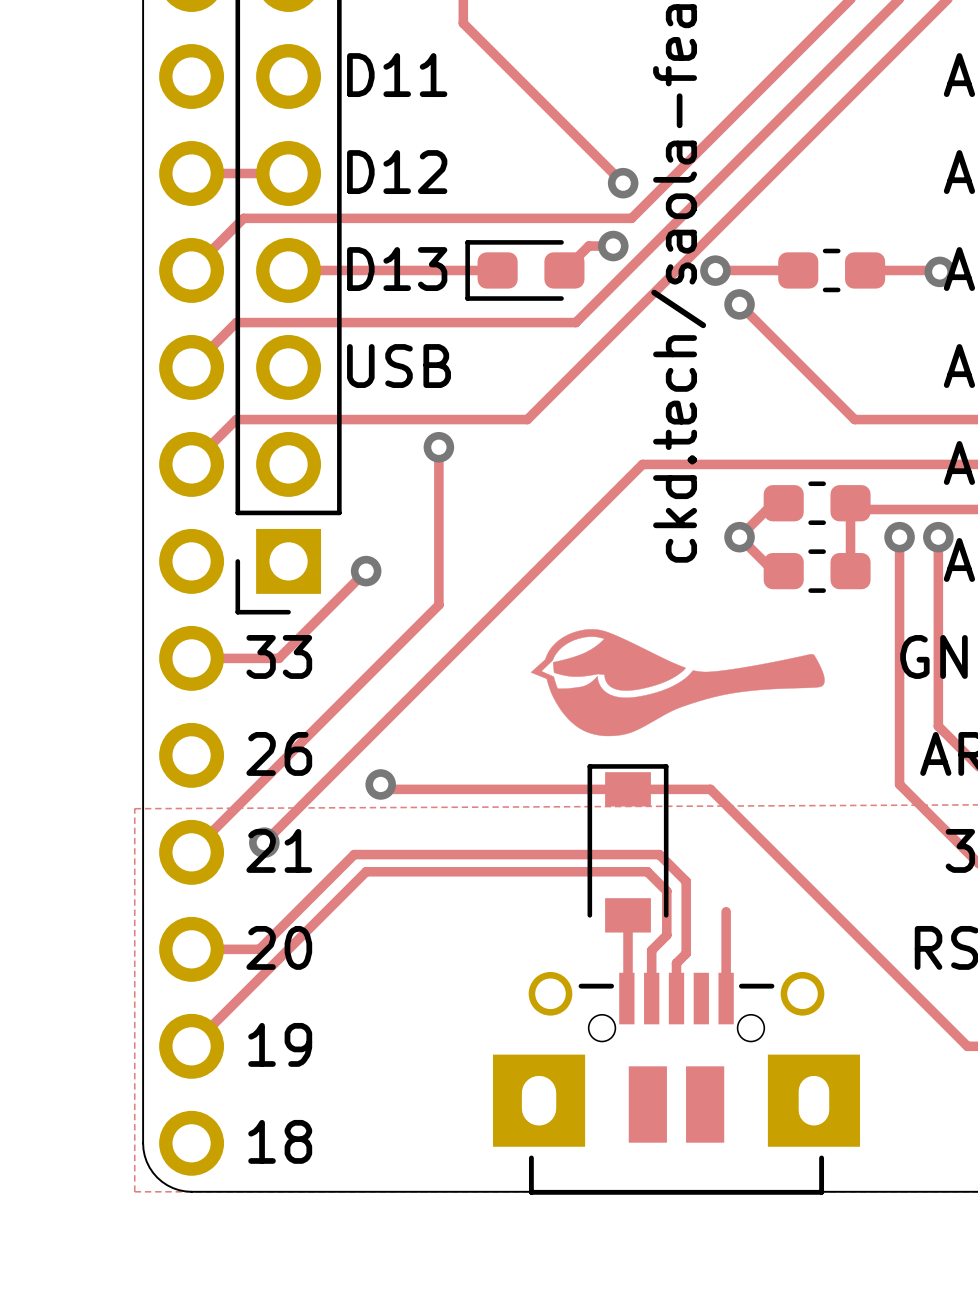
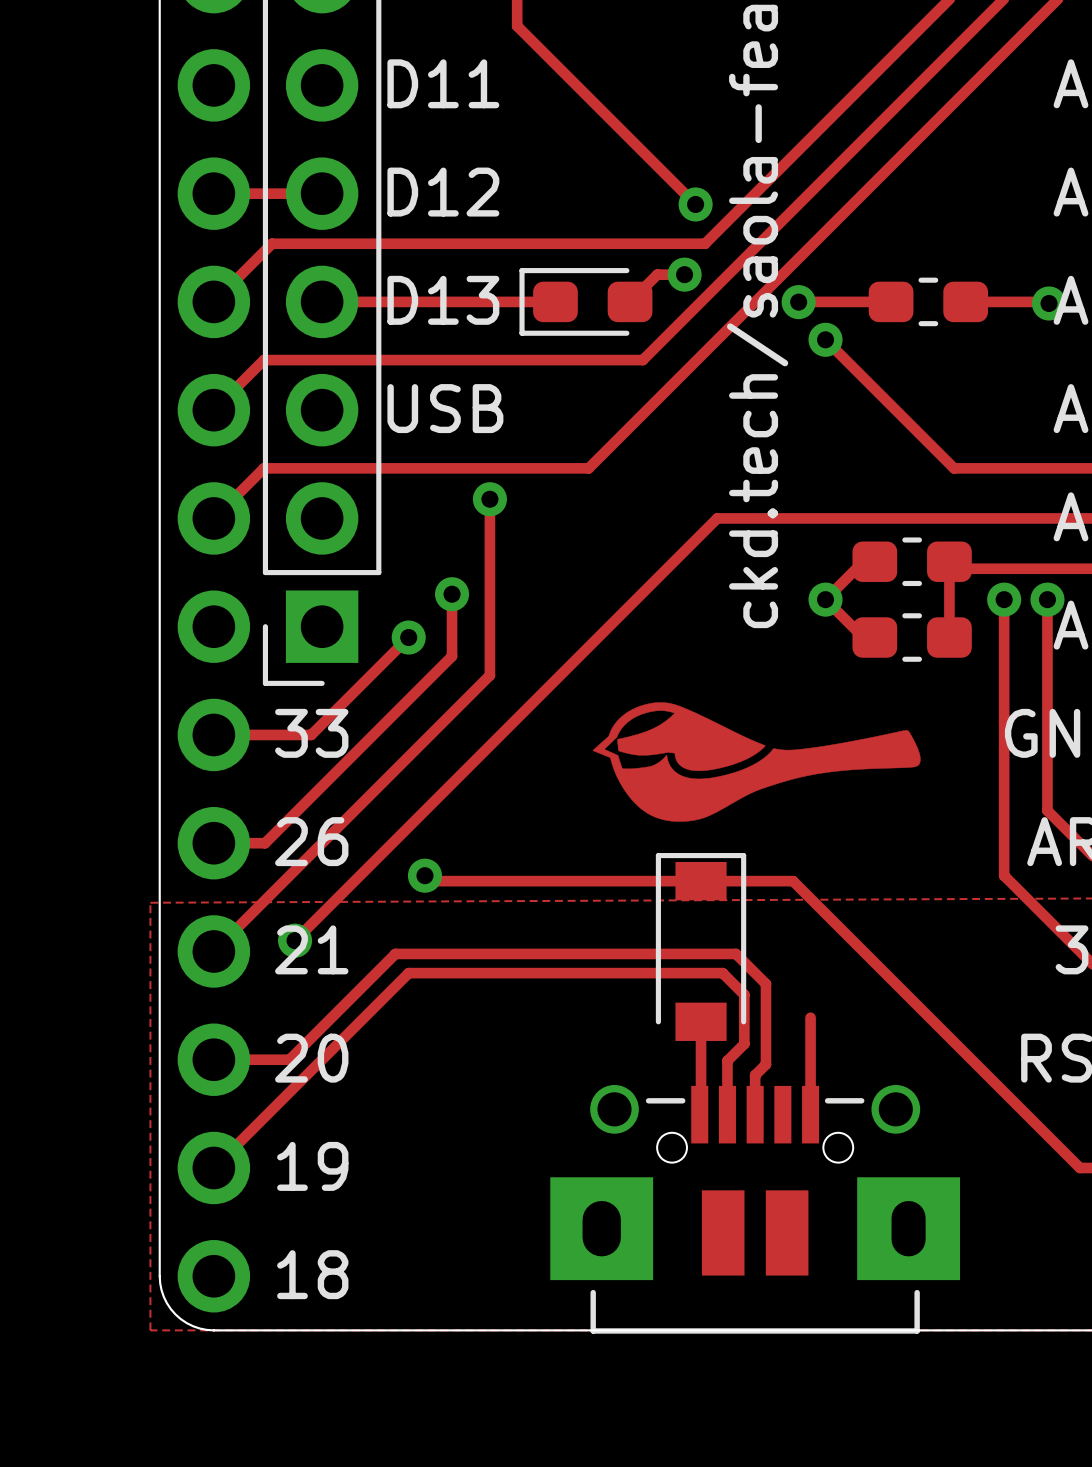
track: none -> (452, 594) (452, 656) (265, 843) (213, 843)
via: none -> (452, 594)

